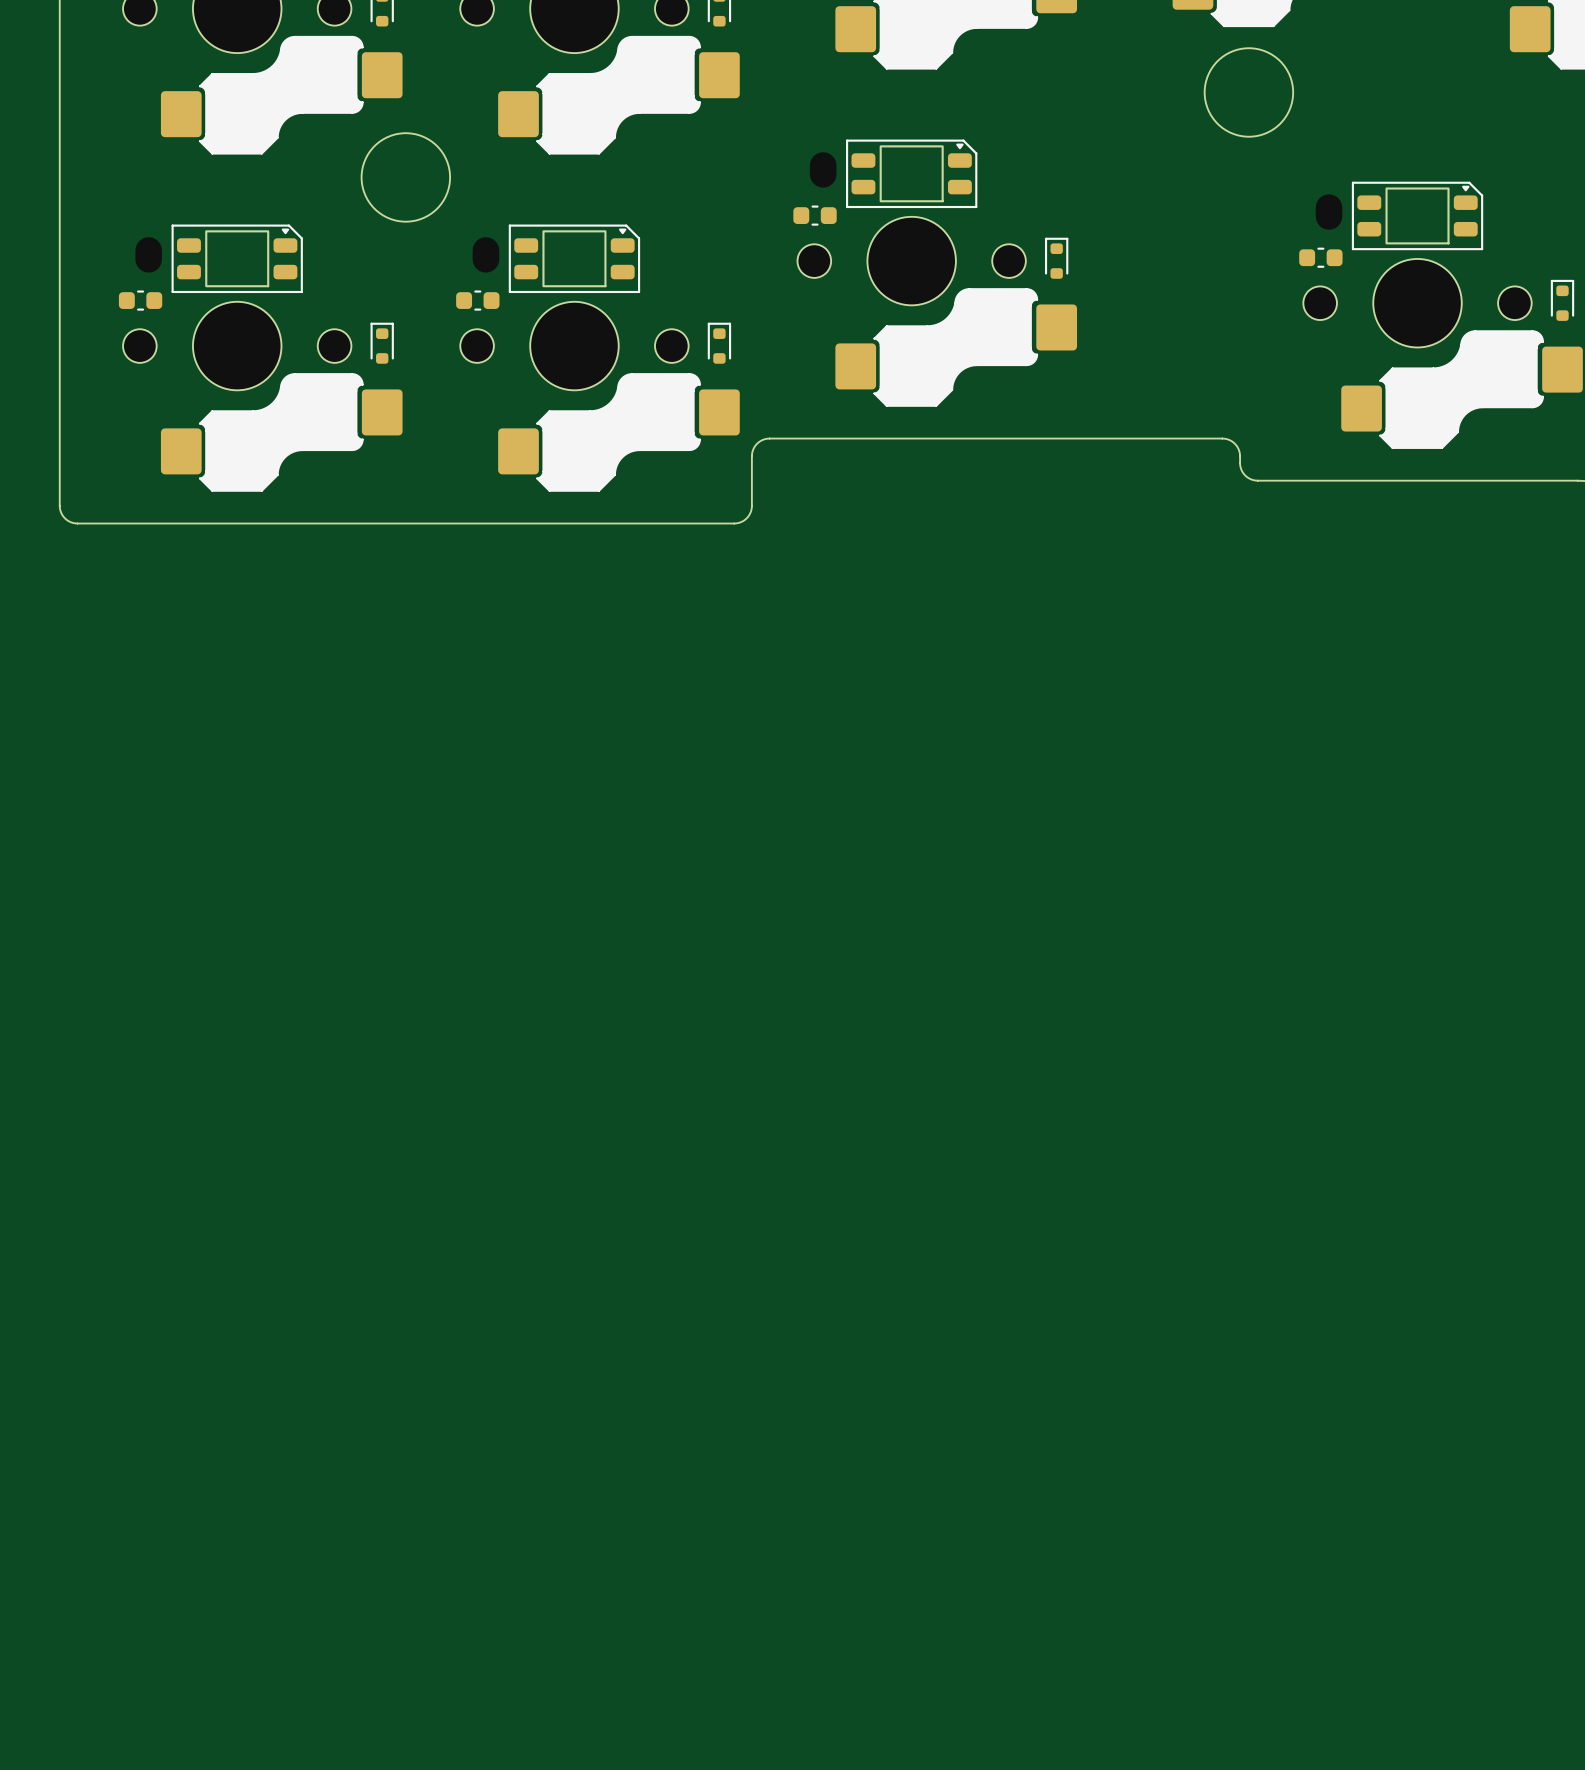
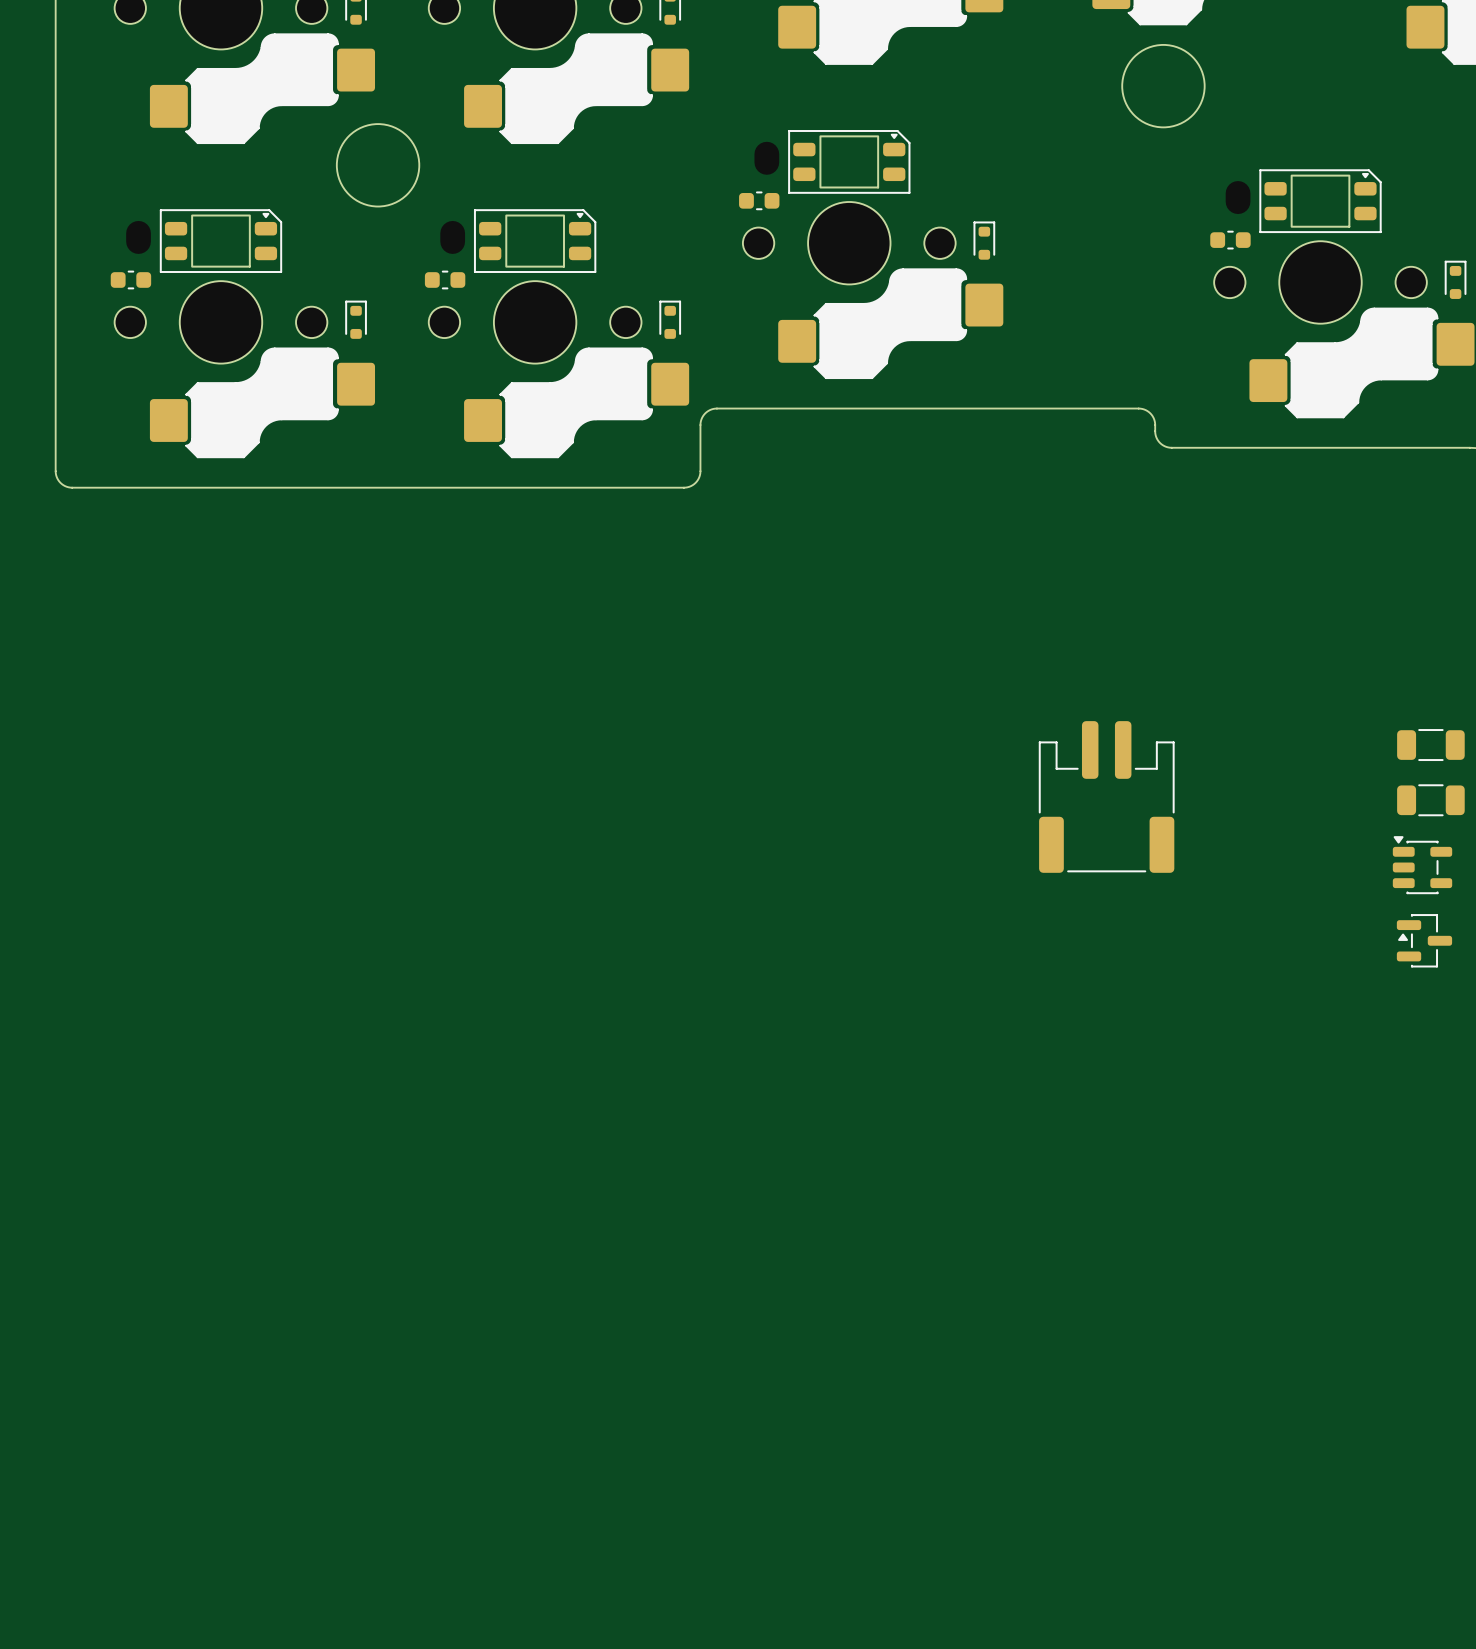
part: none -> (1430, 745)
part: none -> (1106, 796)
part: none -> (1430, 800)
part: none -> (1422, 865)
part: none -> (1424, 940)

